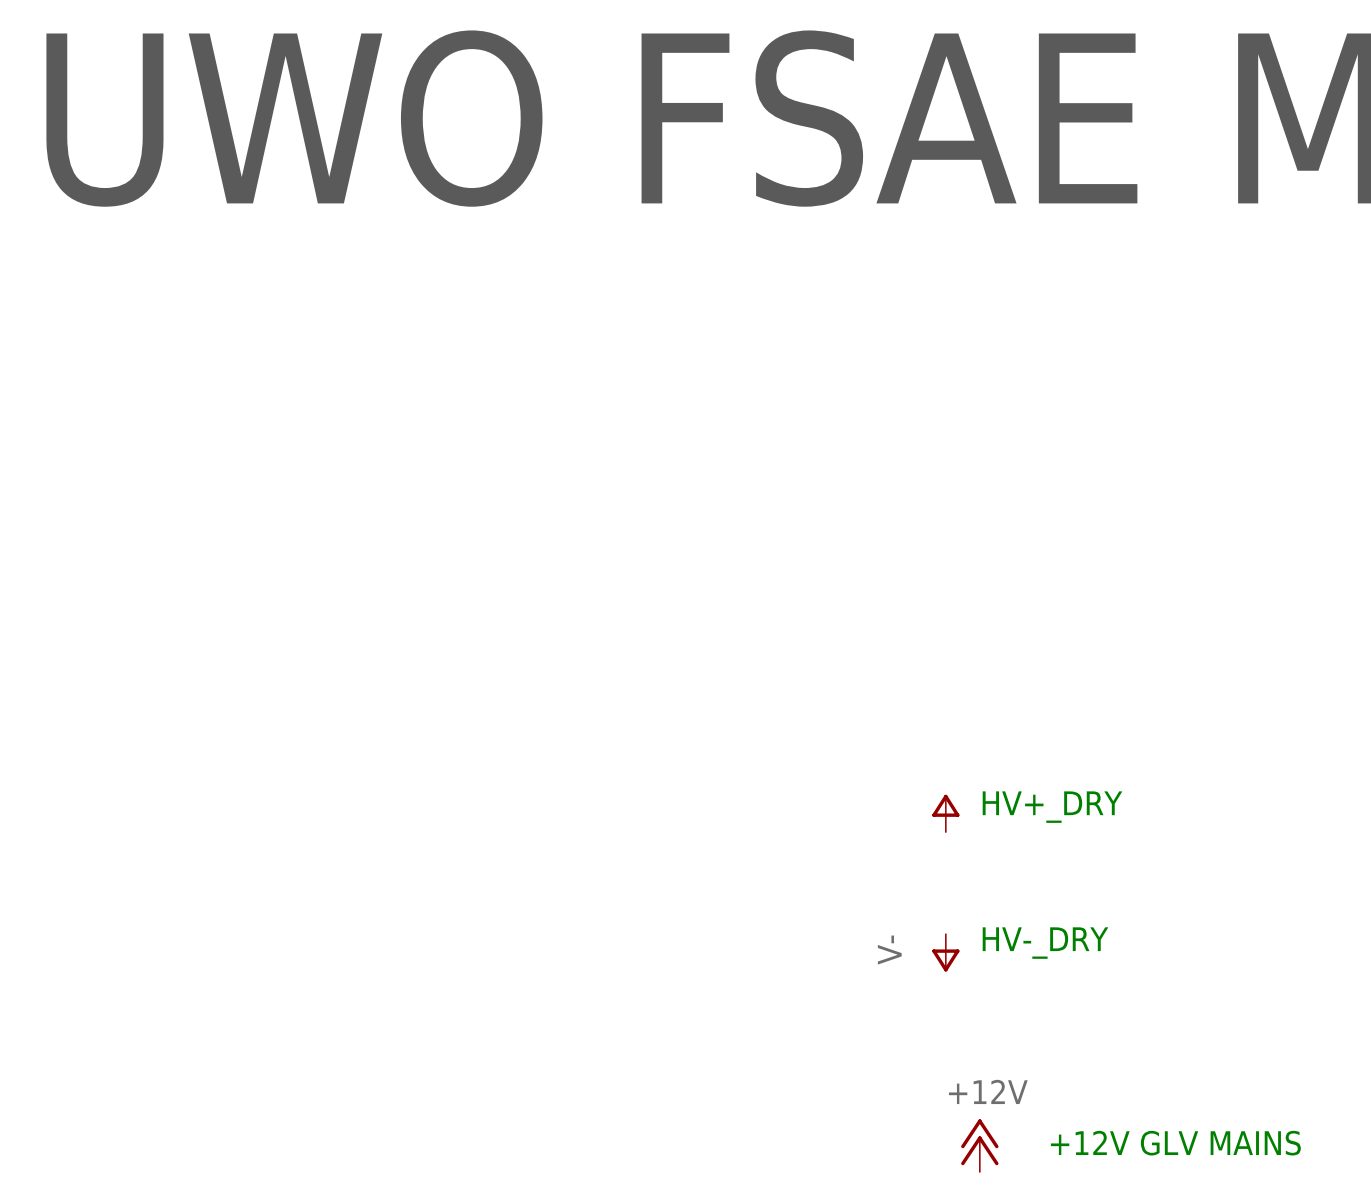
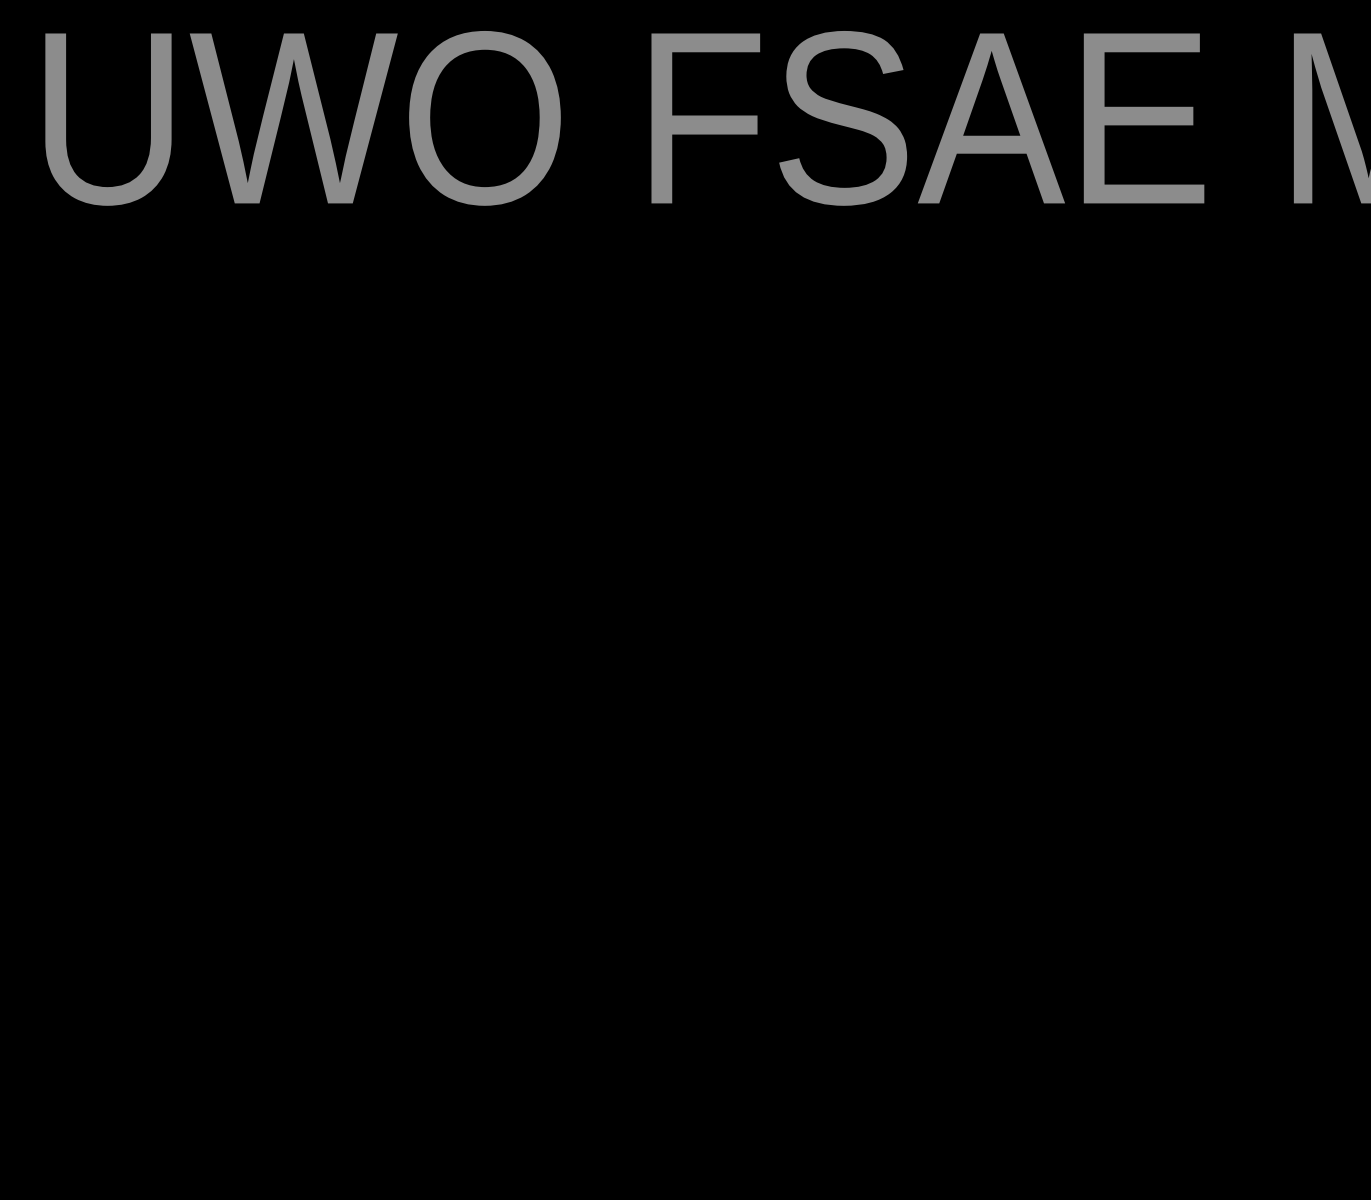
text: HV+_DRY (1052, 807) -> none
power symbol: (945, 813) -> none
text: HV-_DRY (1045, 943) -> none
power symbol: V- (945, 952) -> none
text: +12V GLV MAINS (1175, 1143) -> none
power symbol: +12V (979, 1145) -> none

